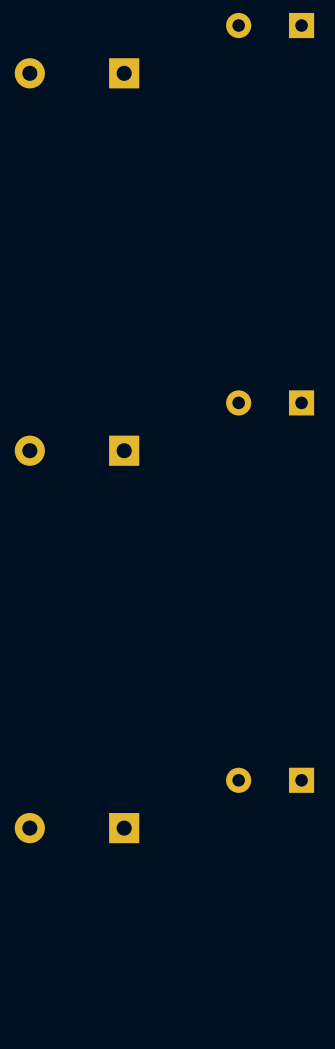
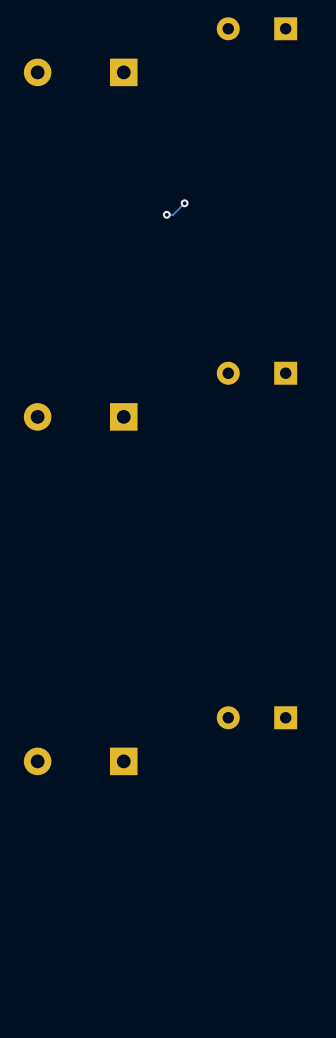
track: none -> (184, 203) (173, 214) (166, 214)
via: none -> (184, 203)
via: none -> (166, 214)

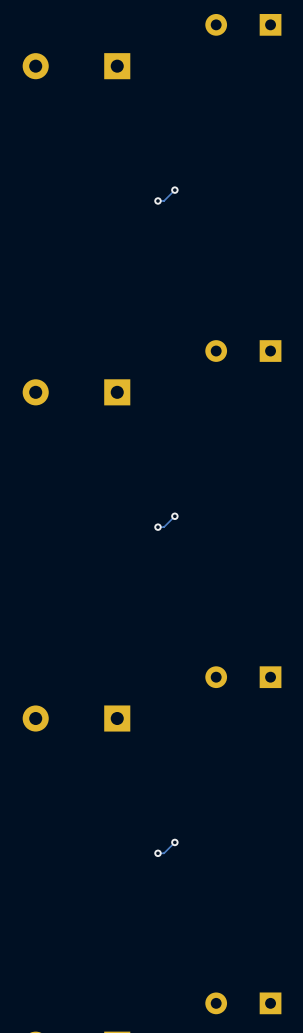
track: none -> (174, 516) (164, 527) (157, 527)
via: none -> (174, 516)
via: none -> (157, 527)
track: none -> (174, 842) (164, 853) (157, 853)
via: none -> (174, 842)
via: none -> (157, 853)

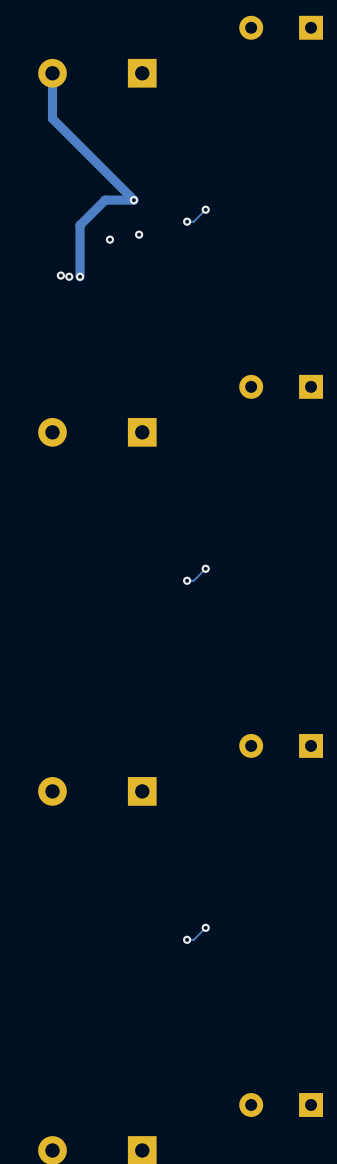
track: none -> (52, 73) (52, 118) (133, 200) (105, 200) (80, 225) (80, 276)
via: none -> (133, 200)
via: none -> (139, 234)
via: none -> (109, 239)
via: none -> (60, 275)
via: none -> (69, 276)
via: none -> (80, 276)

